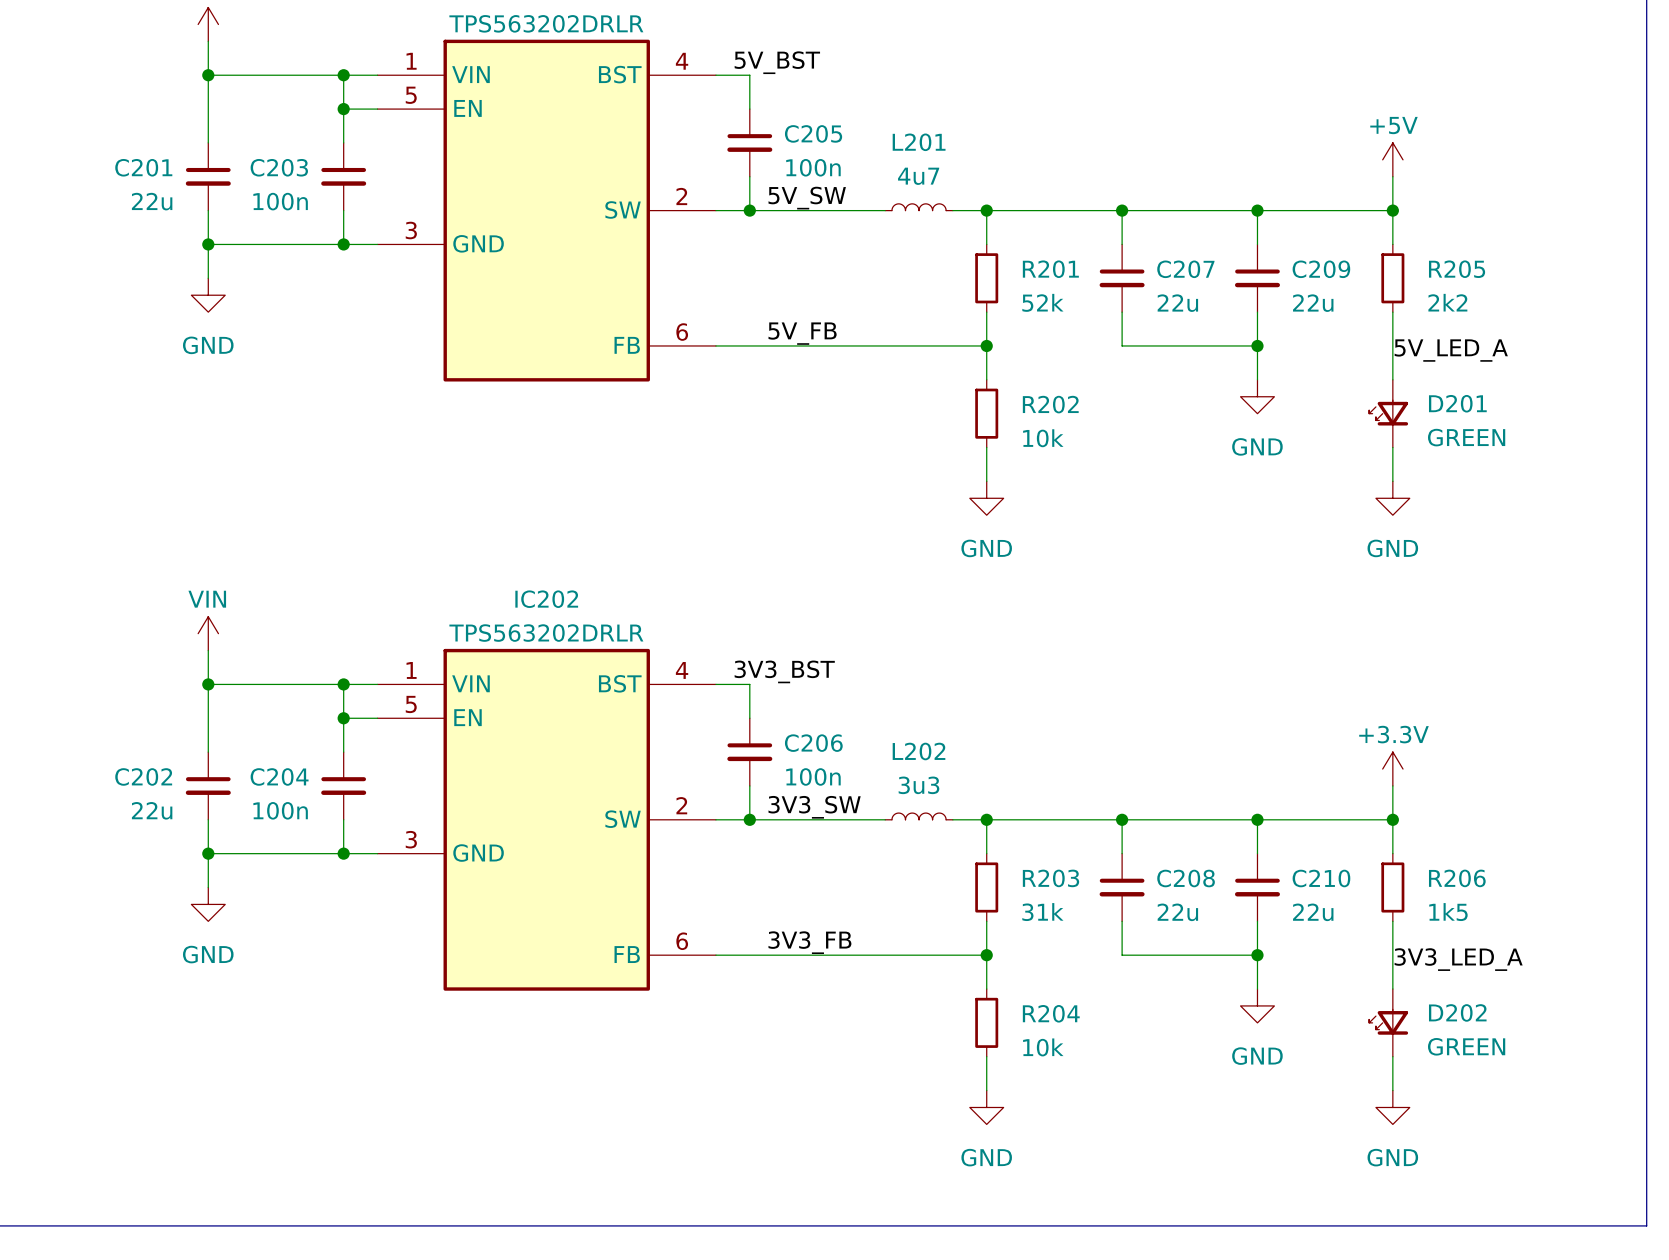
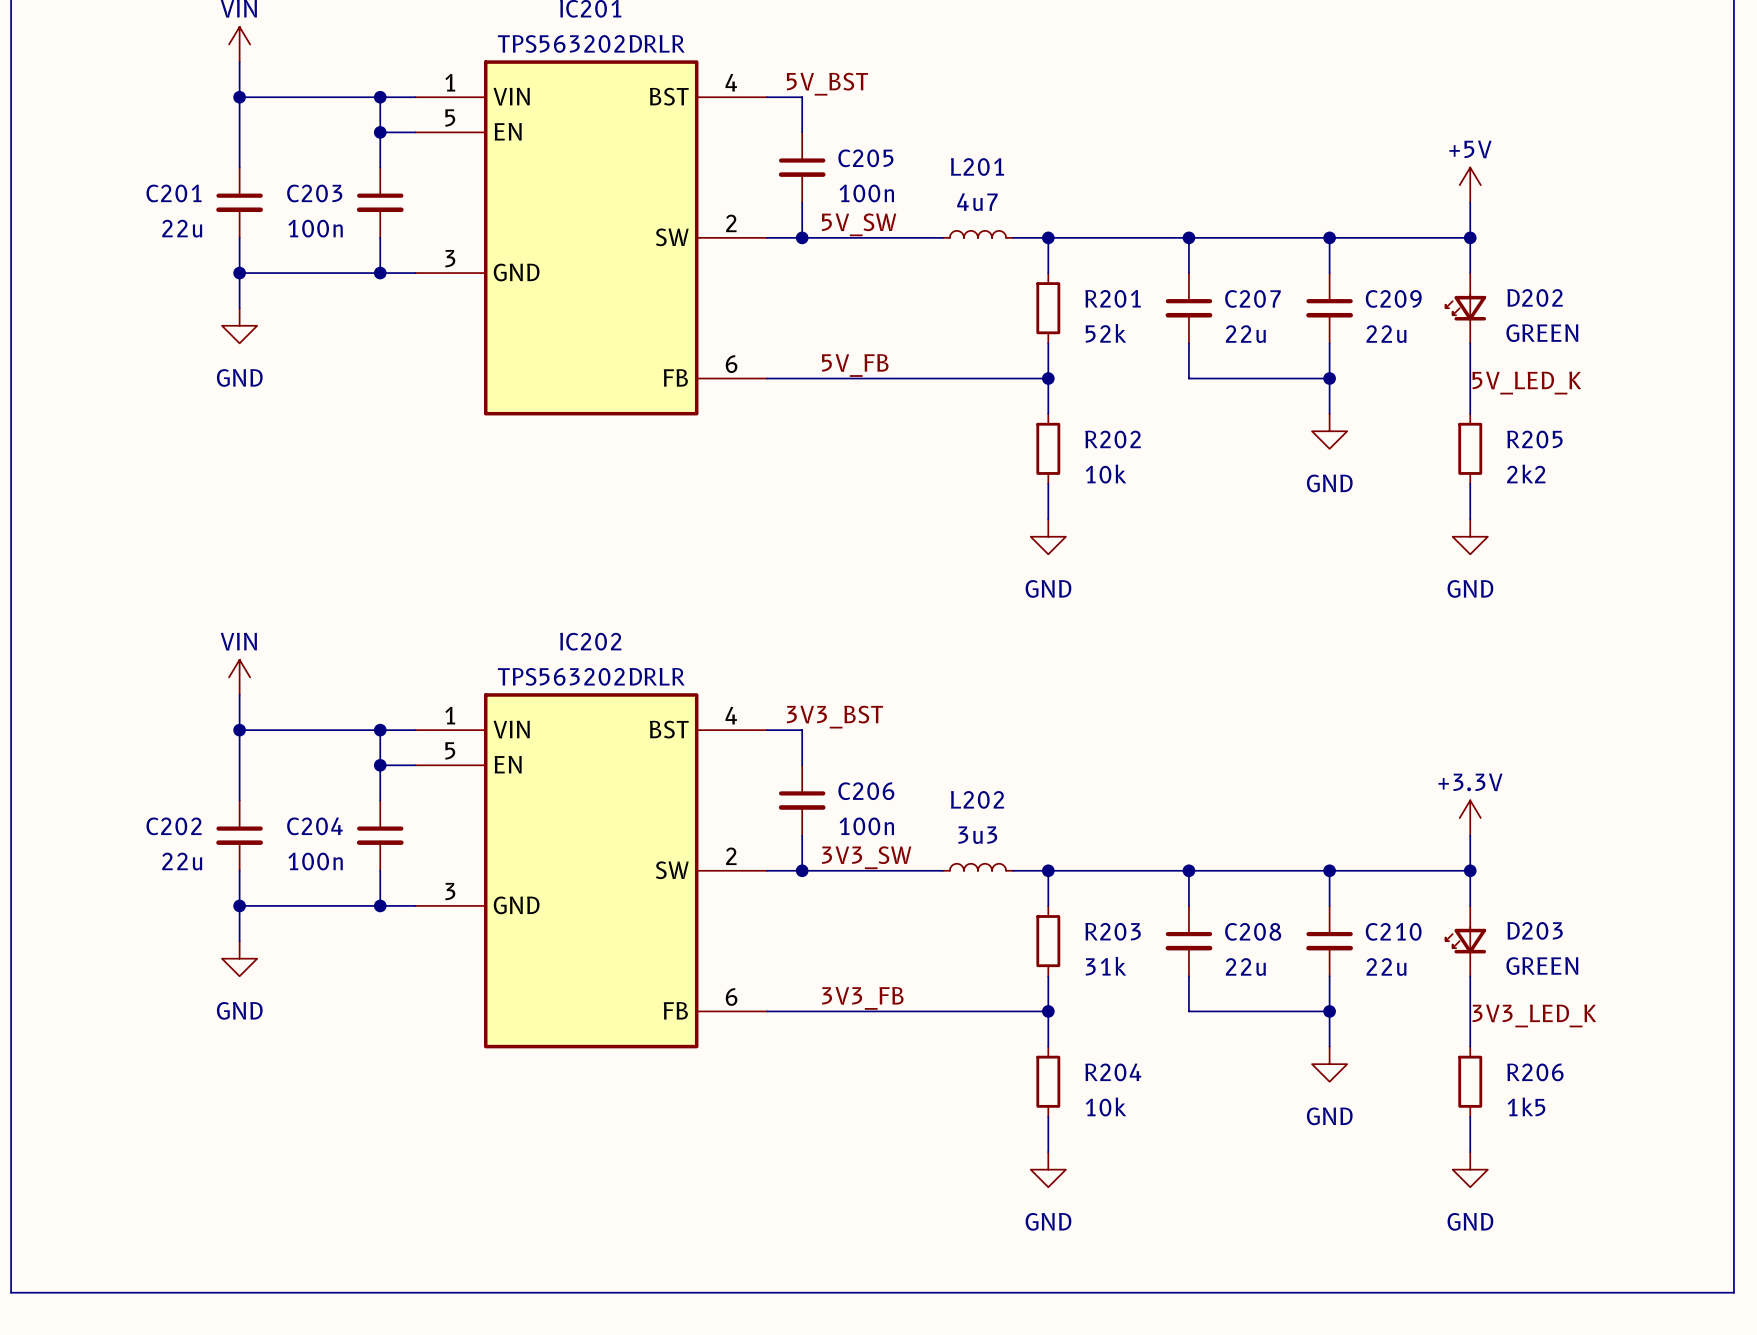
R205 position: (1392, 278) -> (1470, 448)
label: 5V_LED_A (1451, 350) -> 5V_LED_K (1526, 383)
D201: GREEN (1388, 413) -> none
D203: none -> GREEN (1465, 941)
R206 position: (1392, 887) -> (1470, 1081)
label: 3V3_LED_A (1458, 959) -> 3V3_LED_K (1534, 1015)
D202 position: (1388, 1022) -> (1465, 308)

